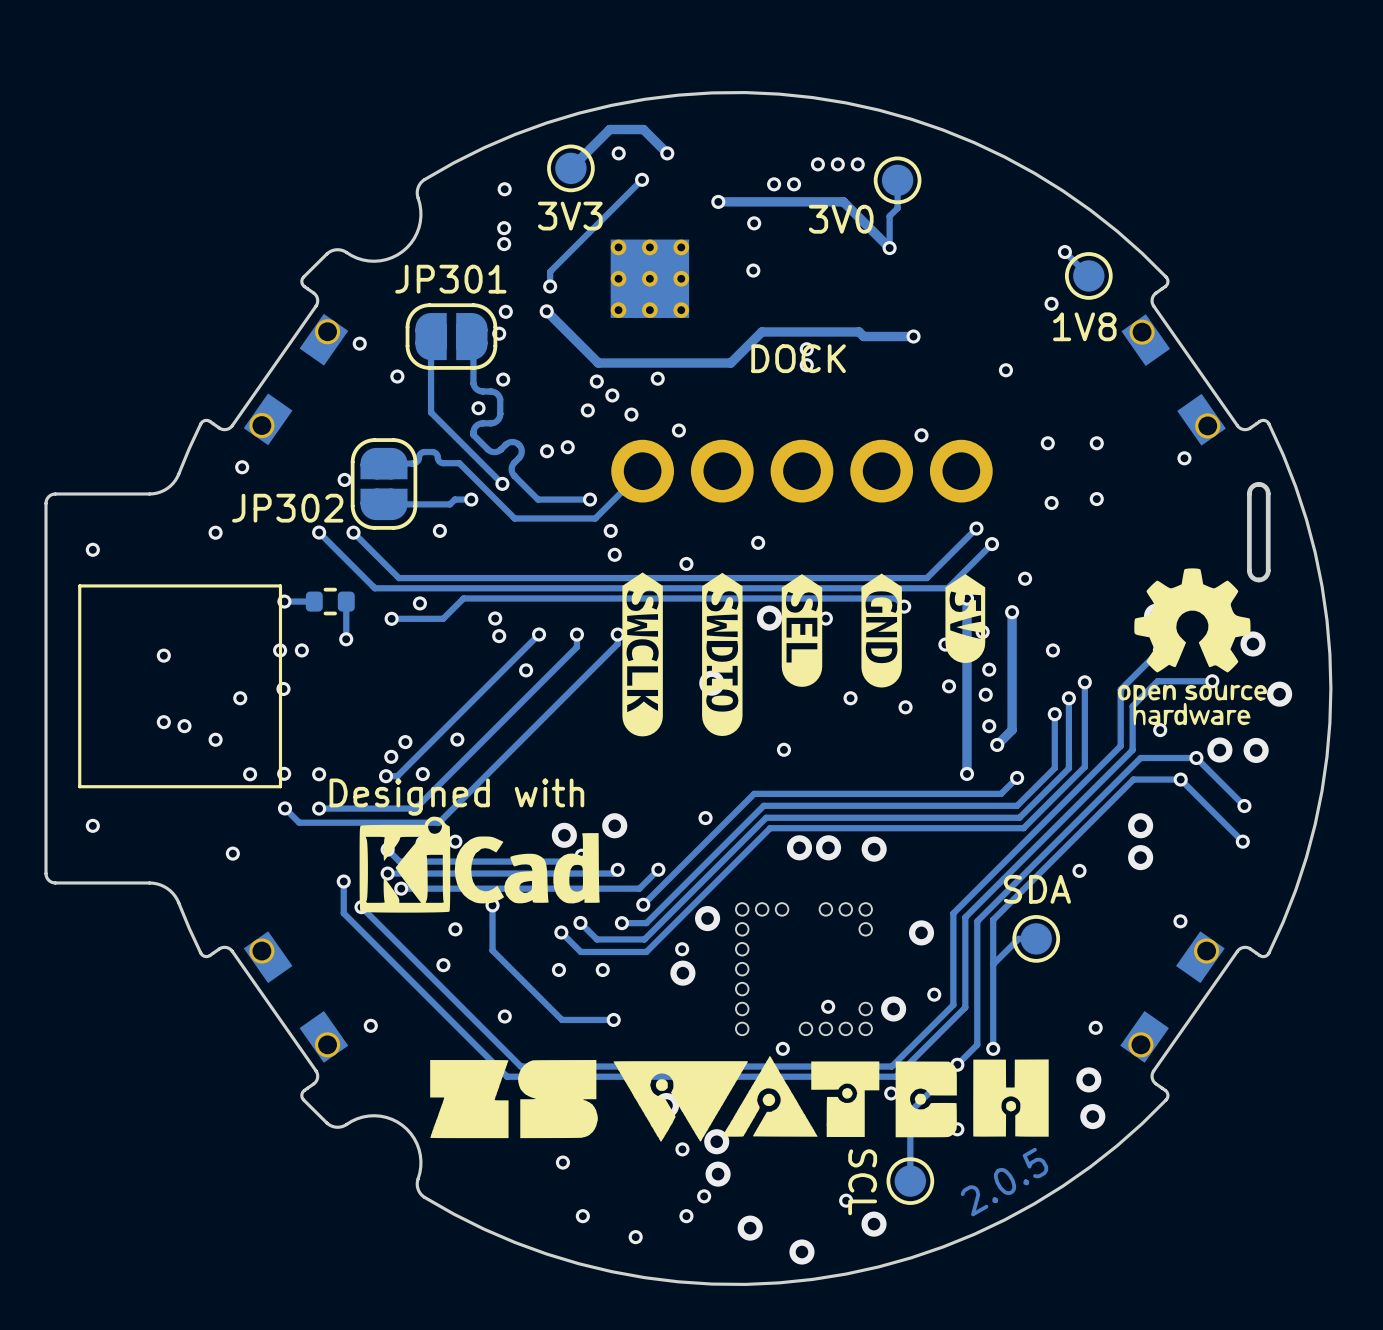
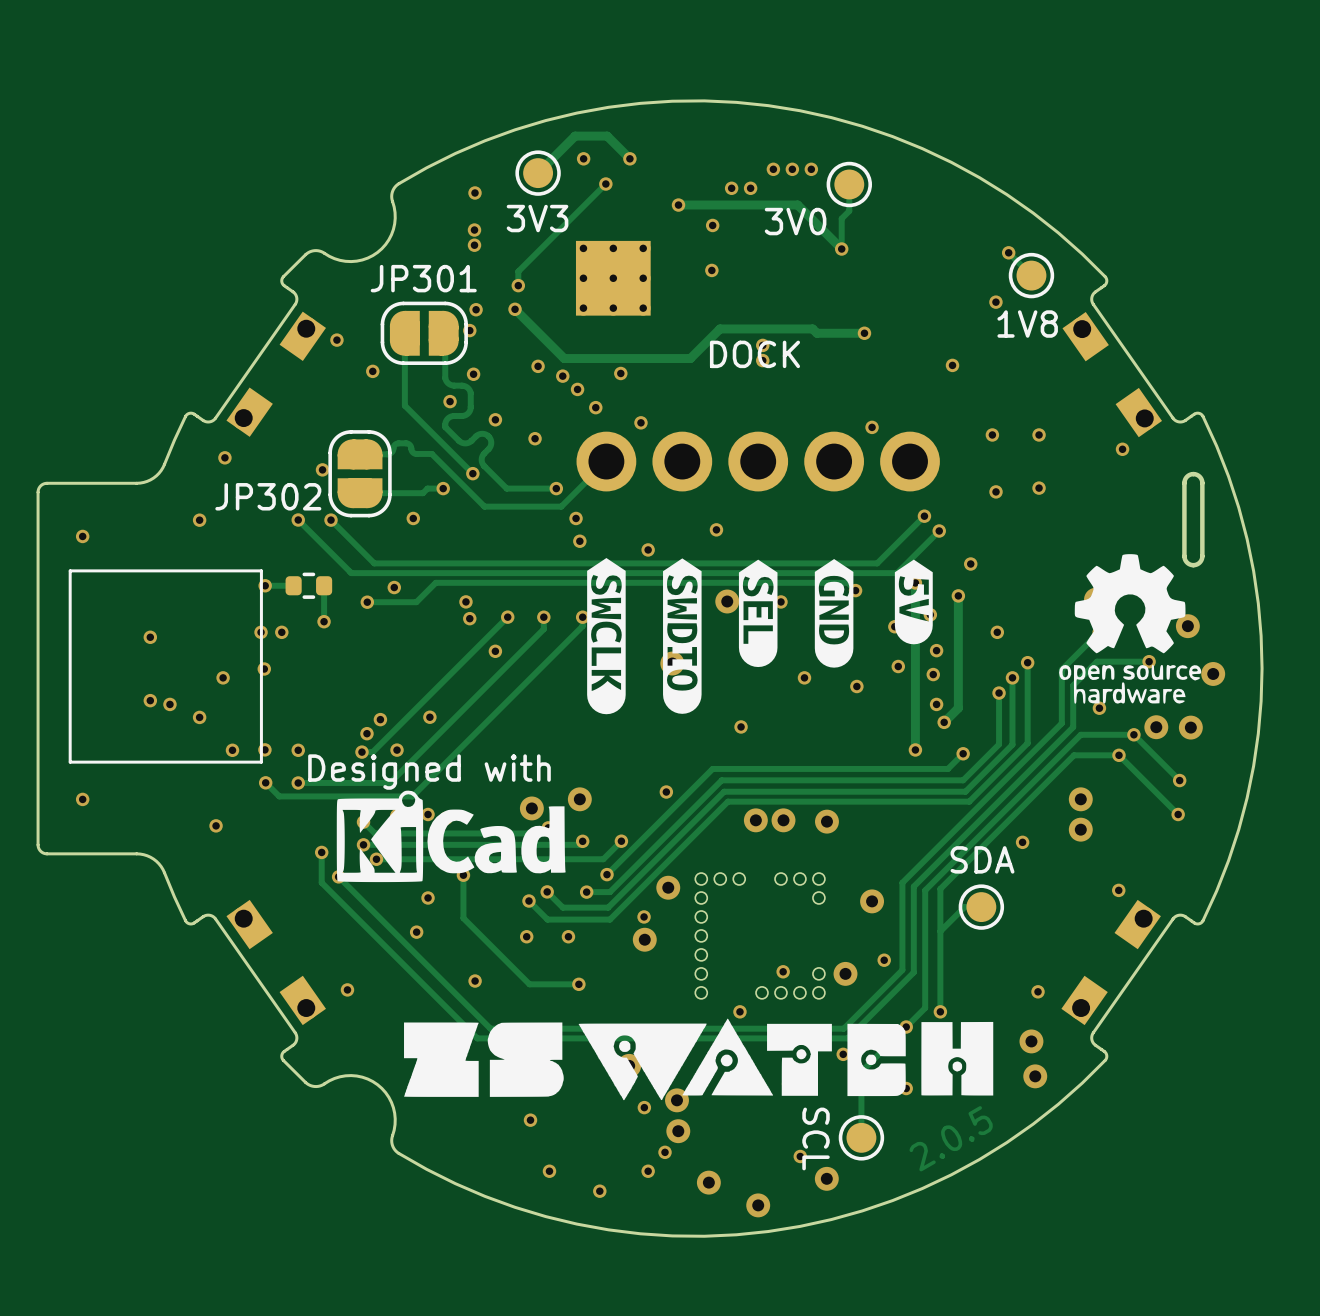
via: none -> (538, 366)
via: (587, 410) -> none
via: none -> (495, 419)
via: (547, 451) -> none

